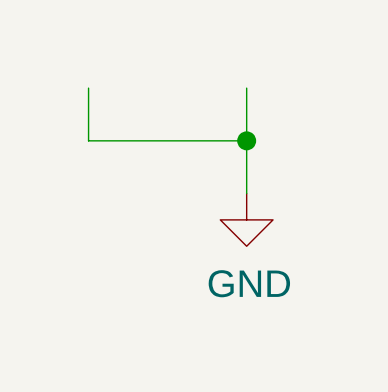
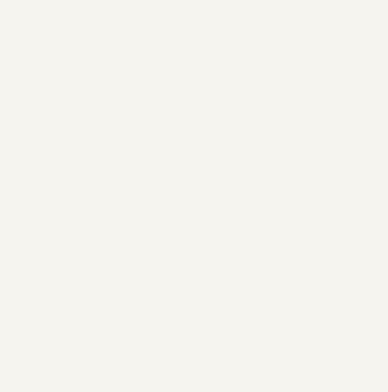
wire: (88, 88) (88, 140) (246, 140) -> none
wire: (246, 88) (246, 193) -> none
junction: (246, 140) -> none
power symbol: GND (246, 219) -> none

